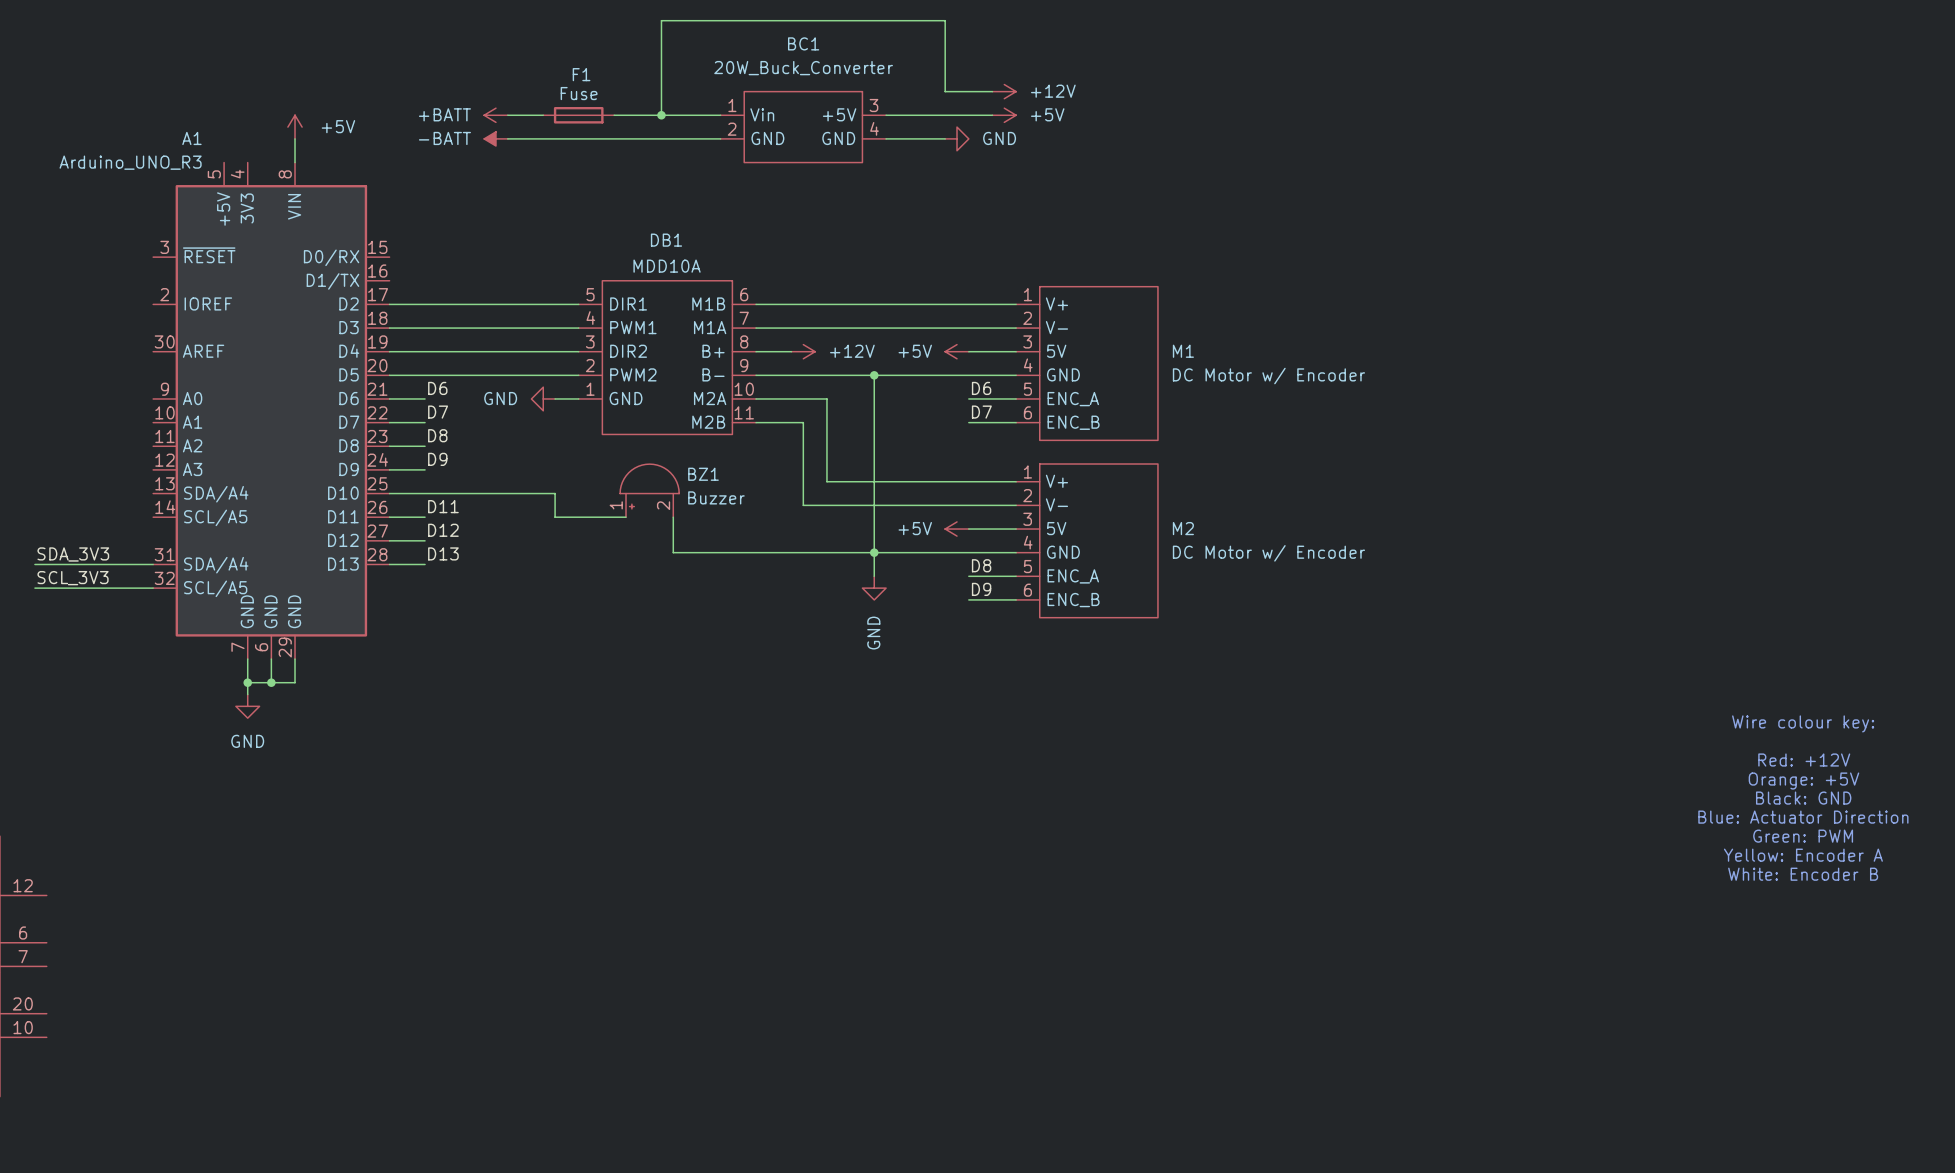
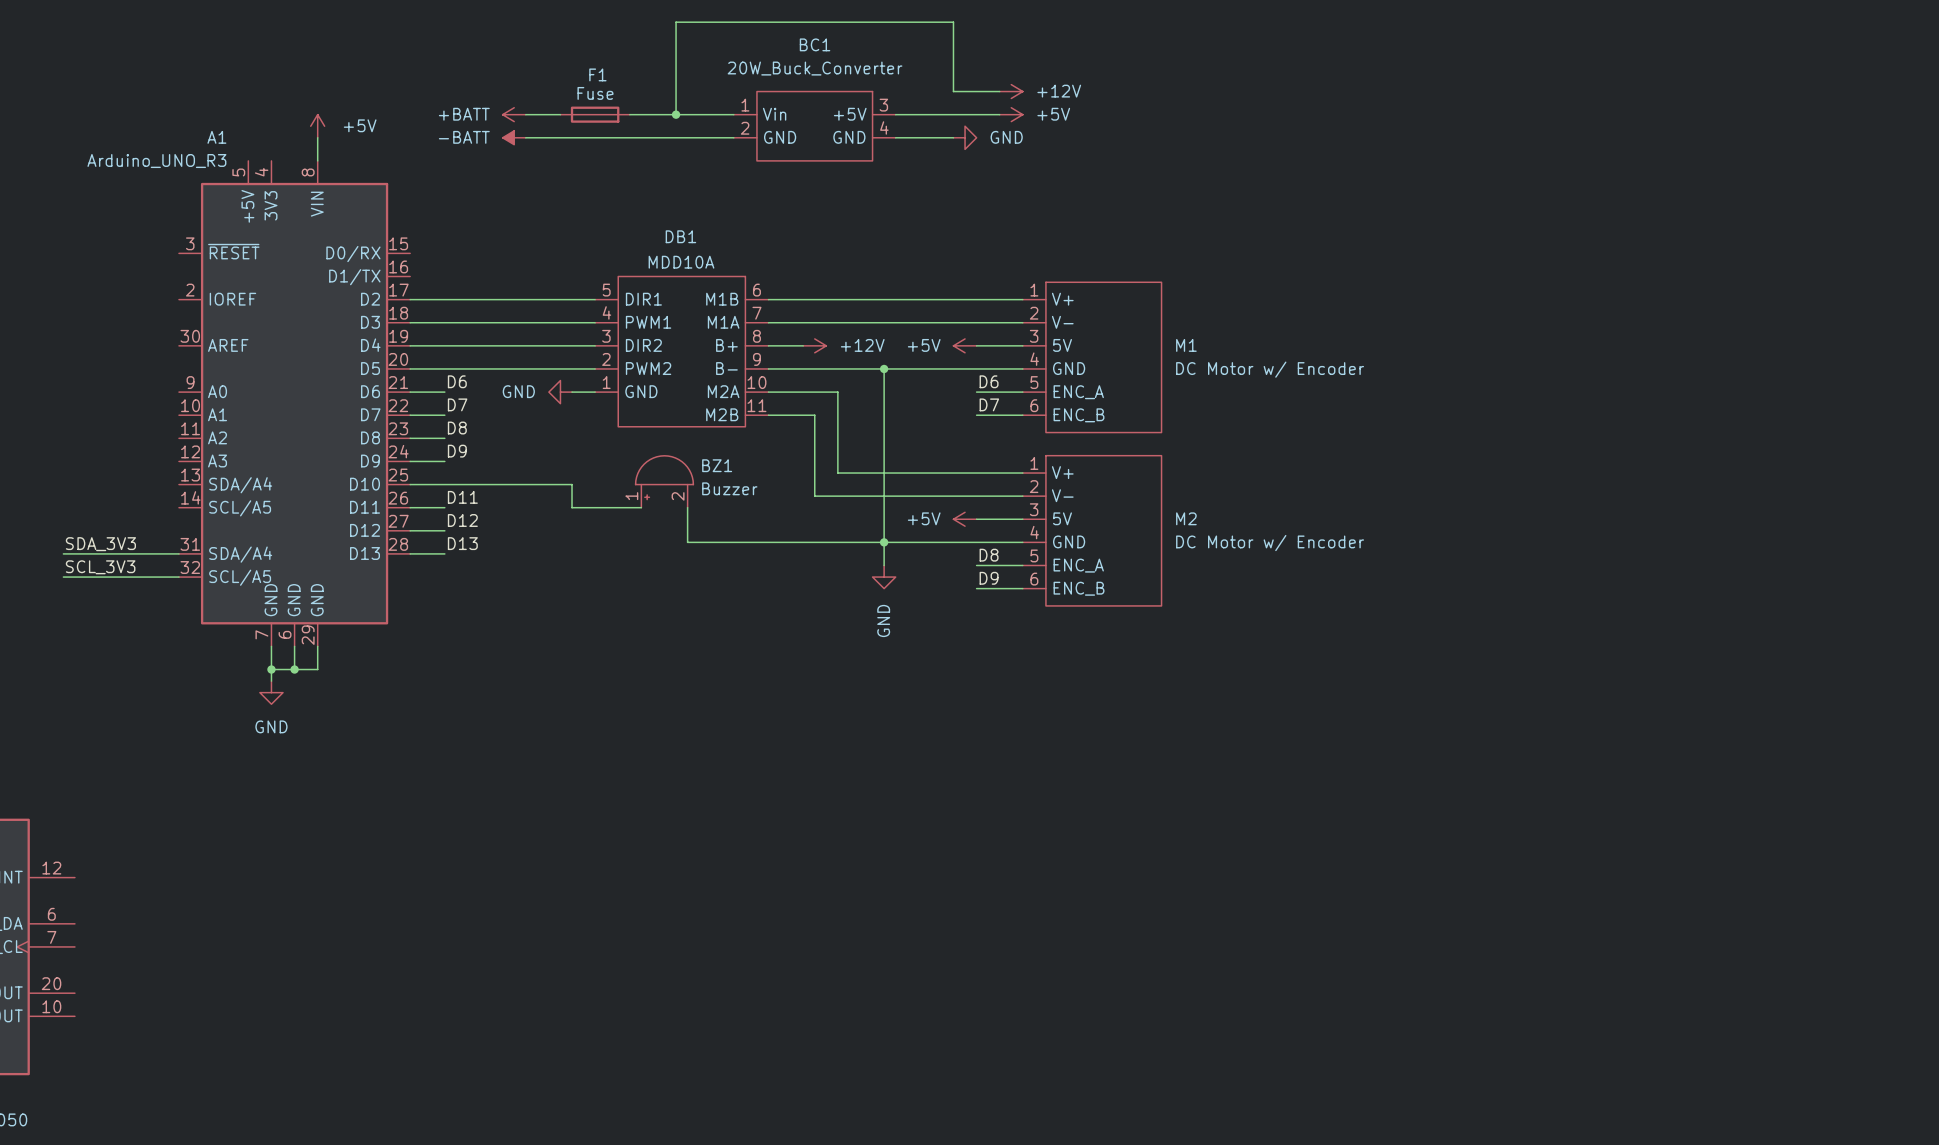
text: Wire colour key: (1803, 723) -> none
text: Red: +12V (1804, 760) -> none
text: Orange: +5V (1803, 781) -> none
text: Black: GND (1803, 798) -> none
text: Blue: Actuator Direction (1803, 817) -> none
text: Green: PWM (1803, 836) -> none
text: Yellow: Encoder A (1803, 855) -> none
text: White: Encoder B (1803, 874) -> none

